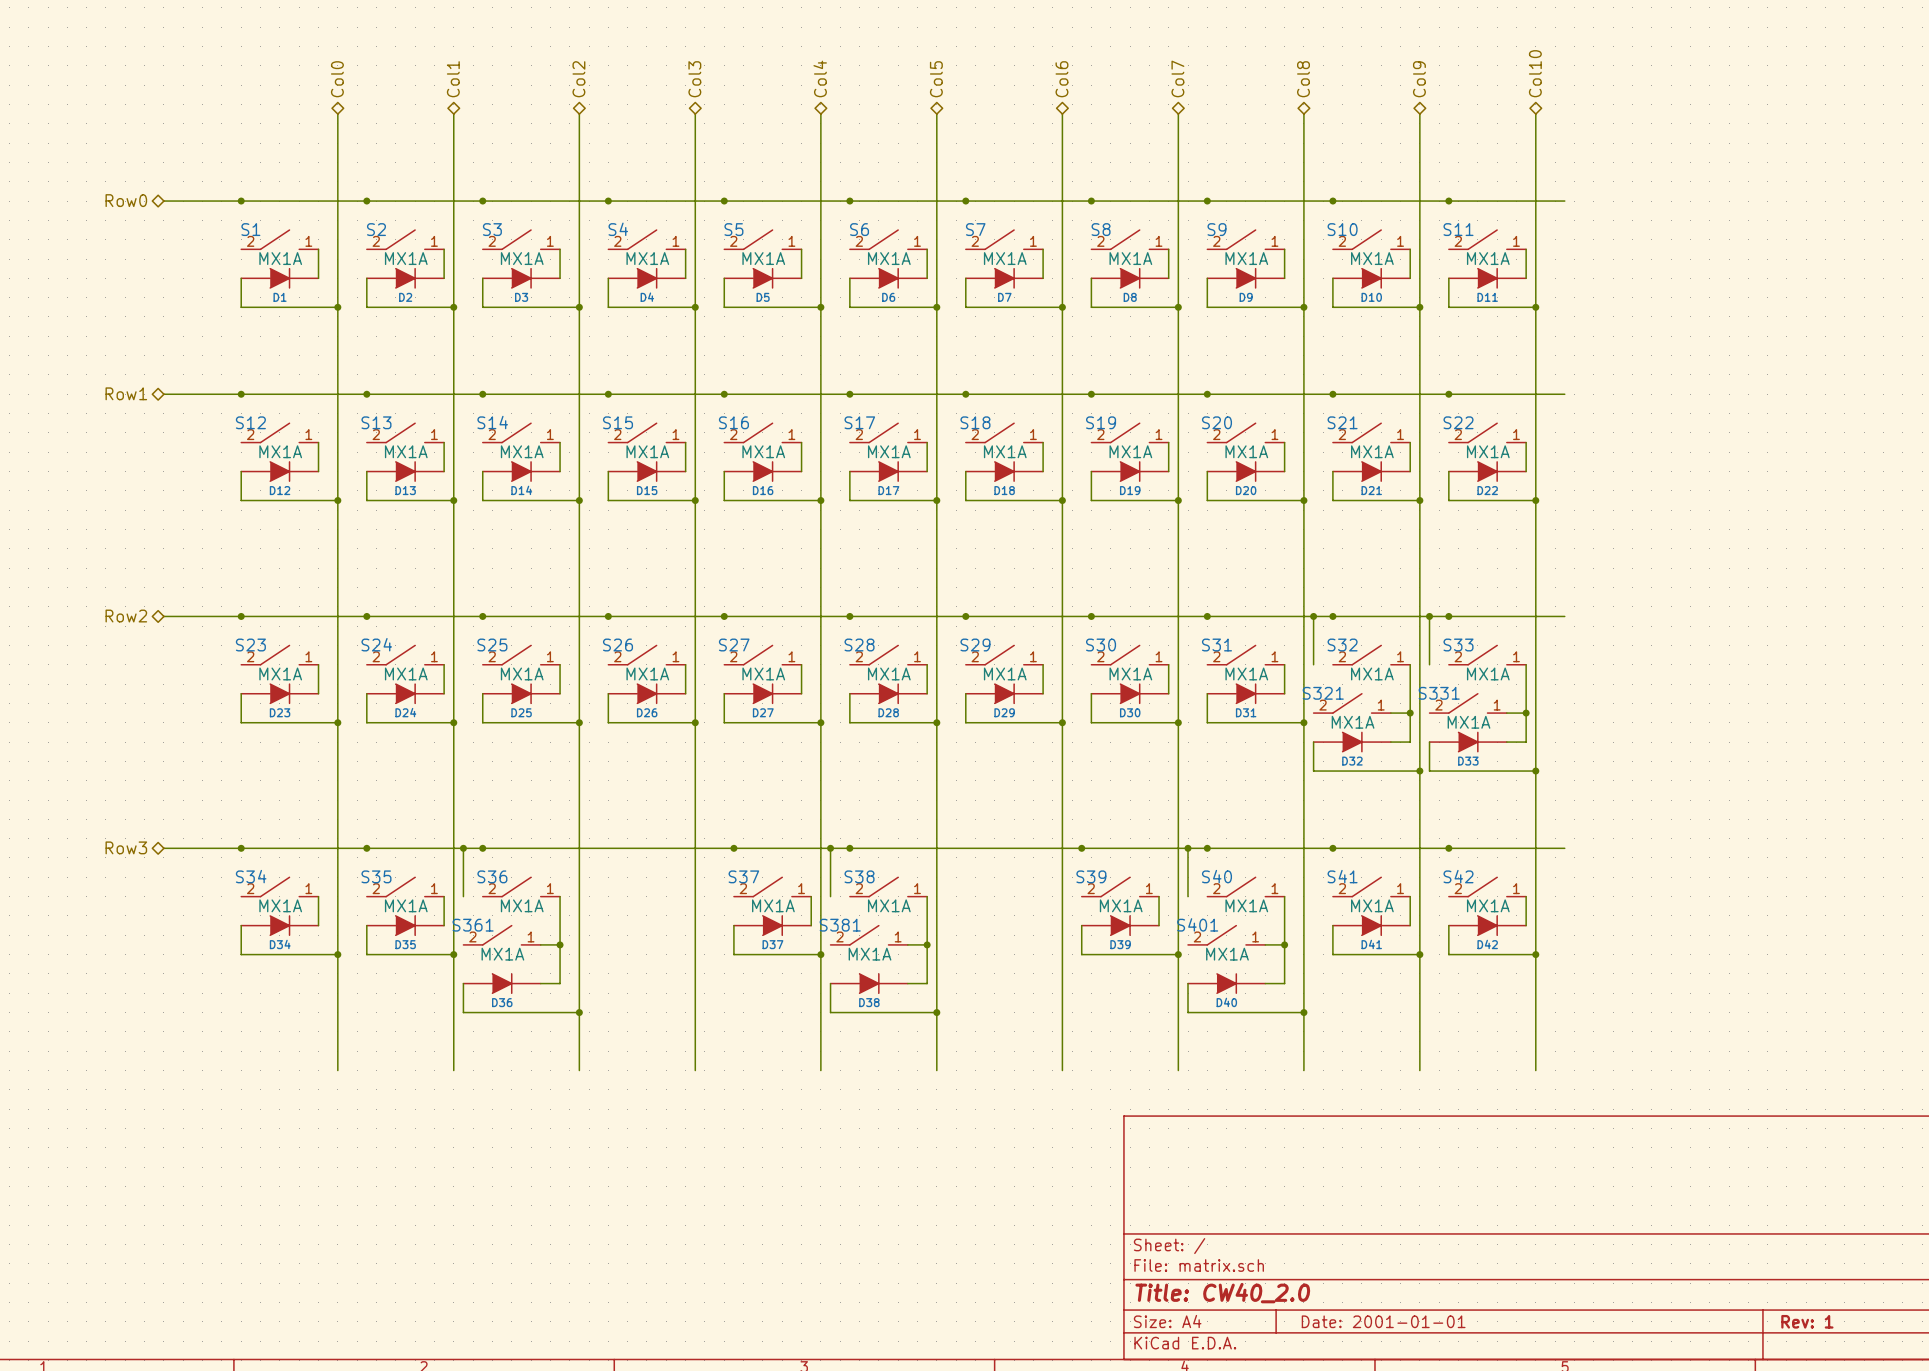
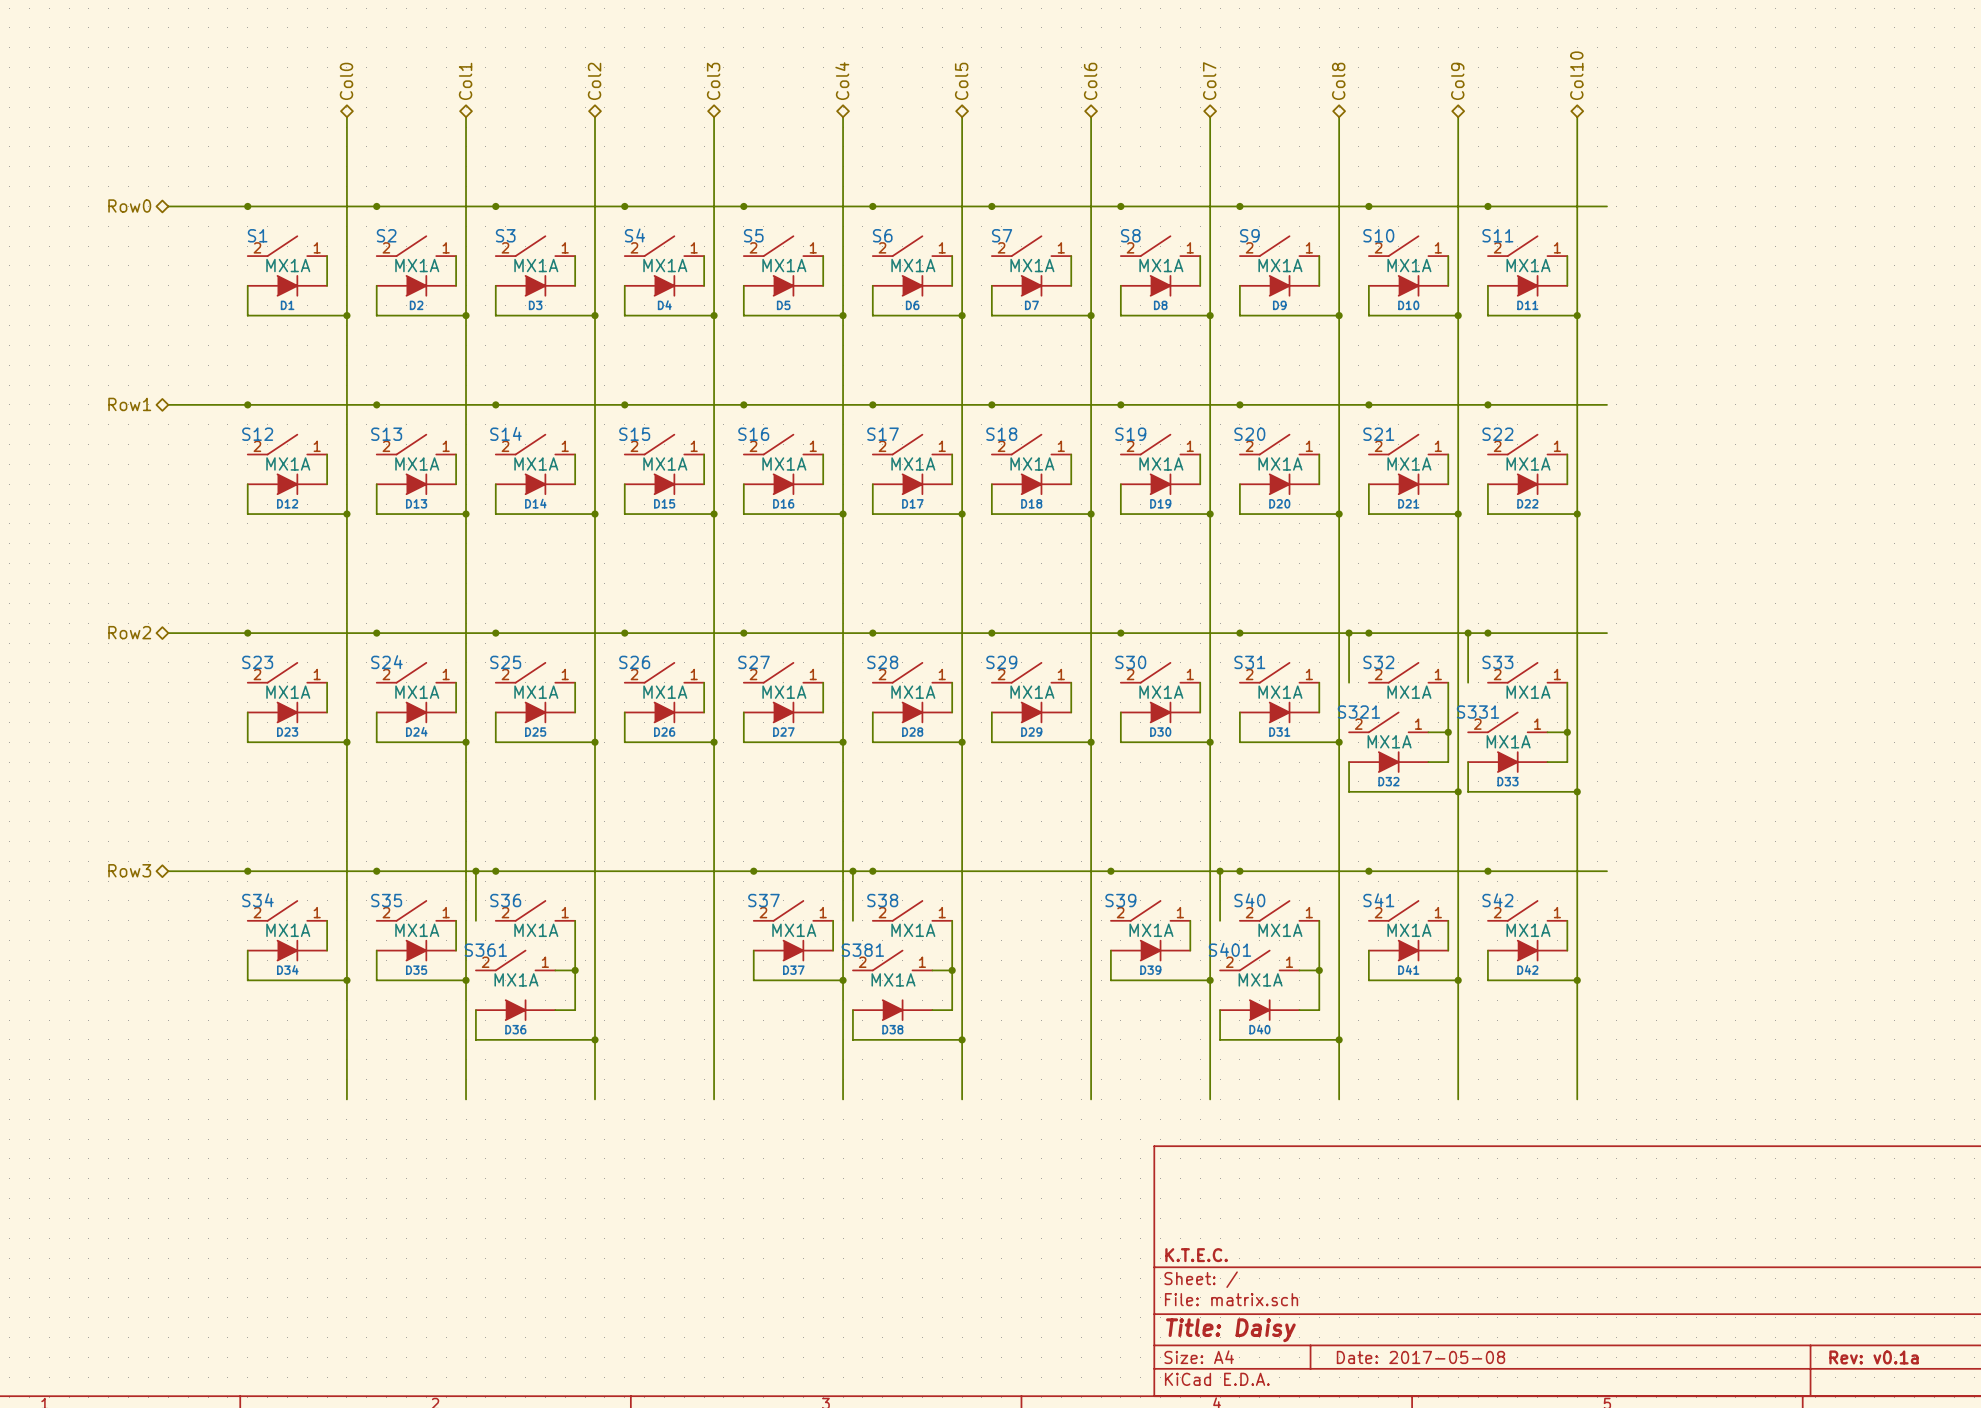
title block: none -> K.T.E.C. (1196, 1255)
title block: Title: CW40_2.0 (1222, 1293) -> Title: Daisy (1230, 1330)
title block: Date: 2001-01-01 (1383, 1321) -> Date: 2017-05-08 (1420, 1357)
title block: Rev: 1 (1807, 1321) -> Rev: v0.1a (1874, 1357)

